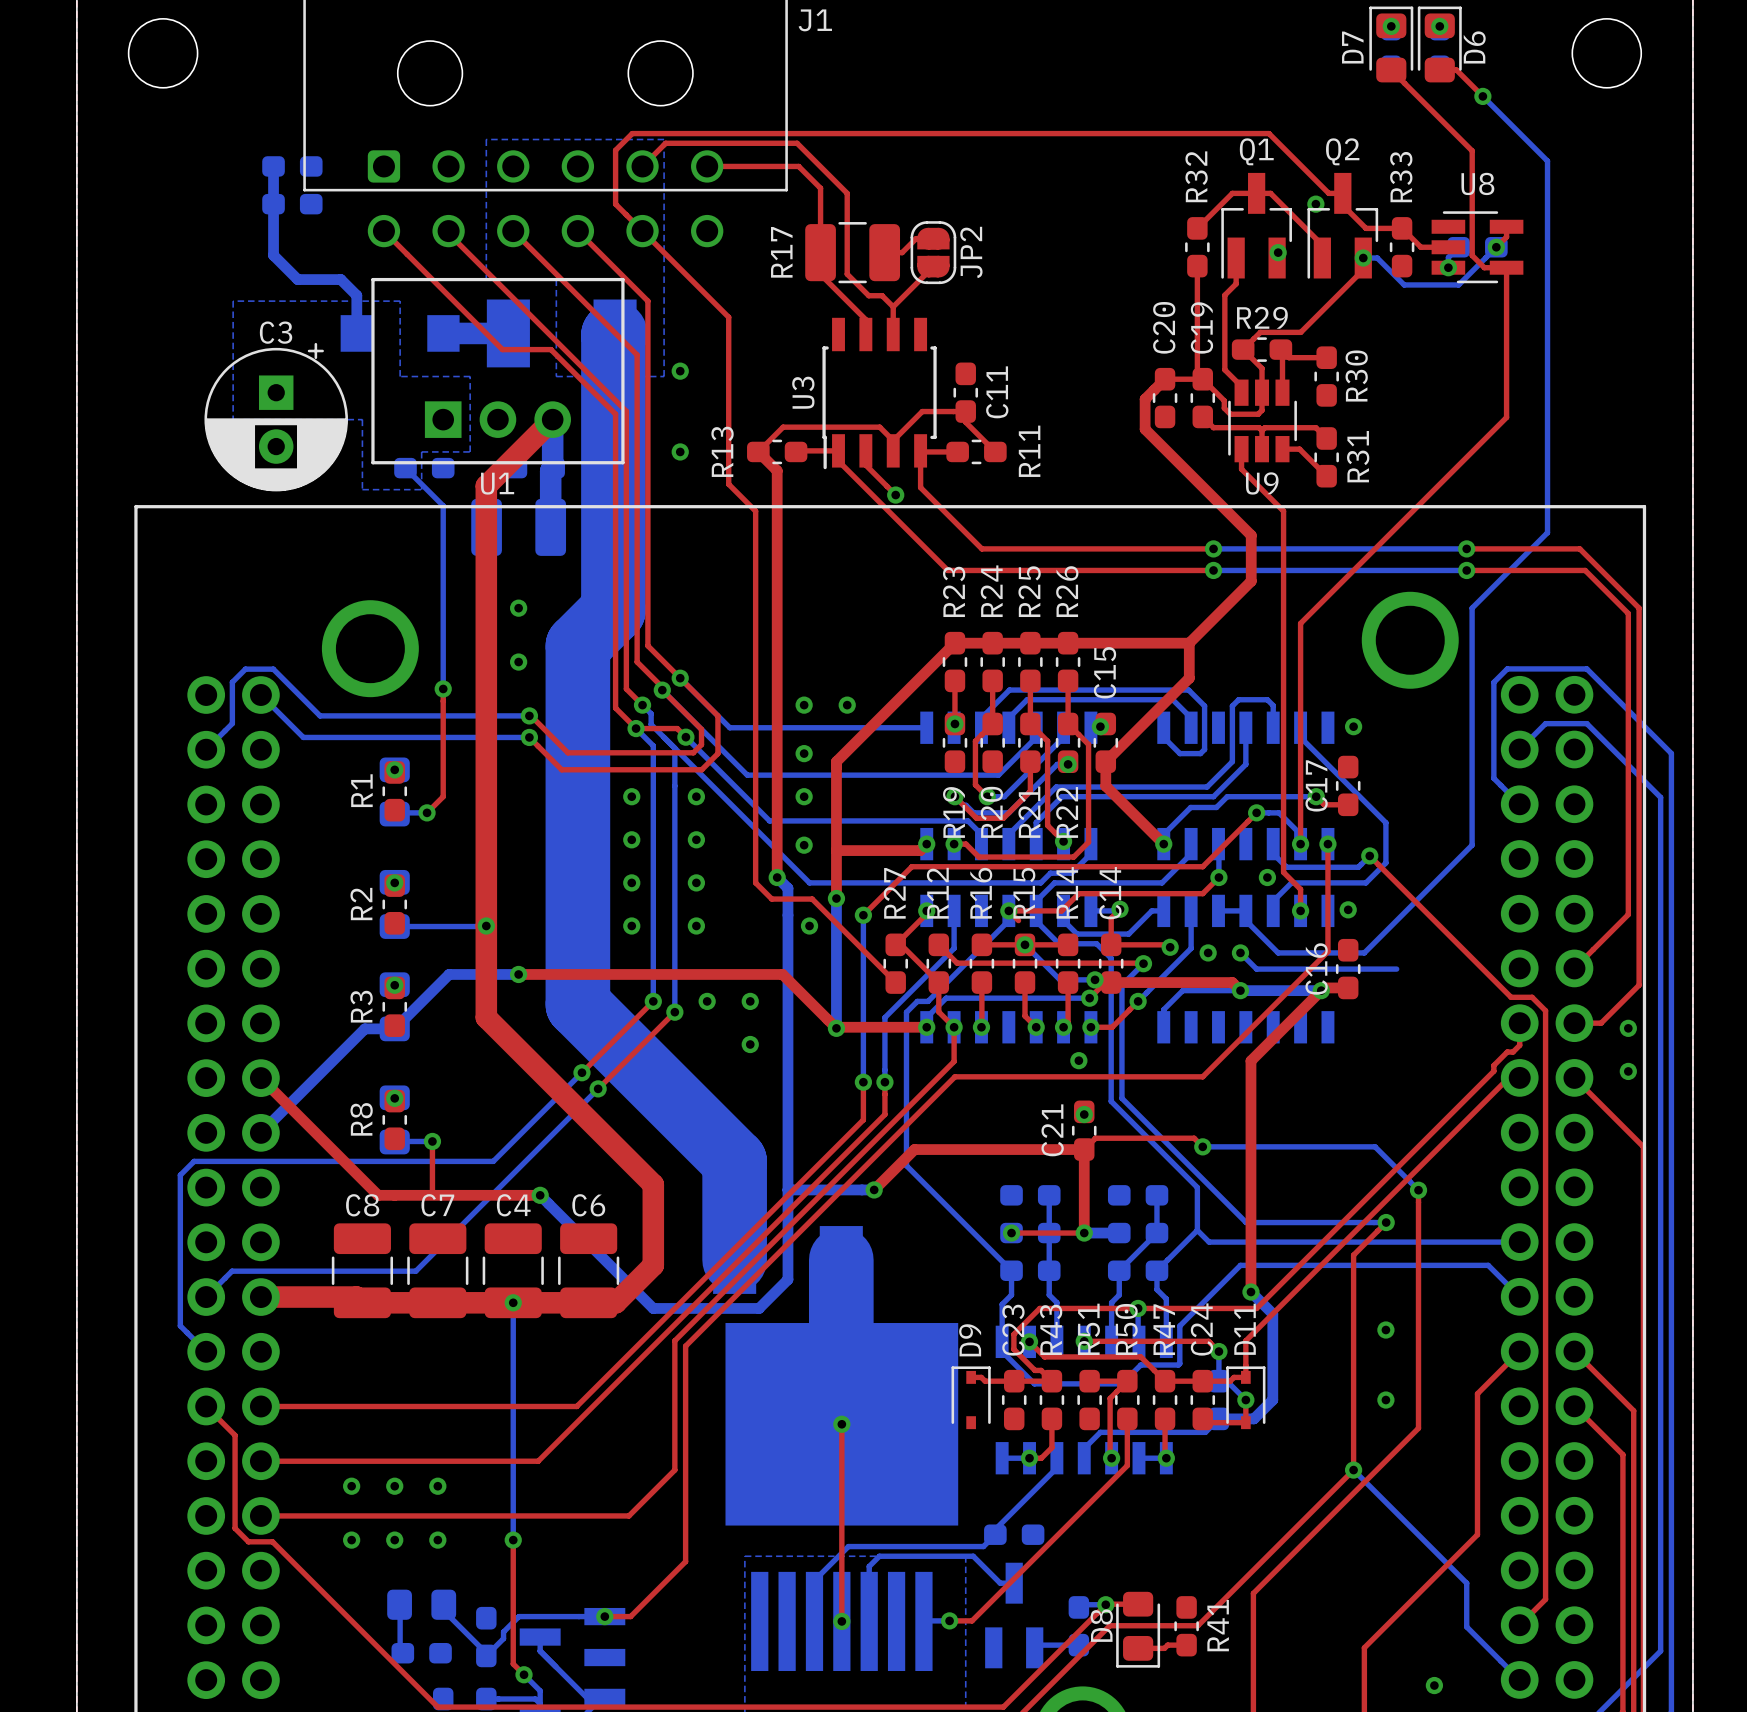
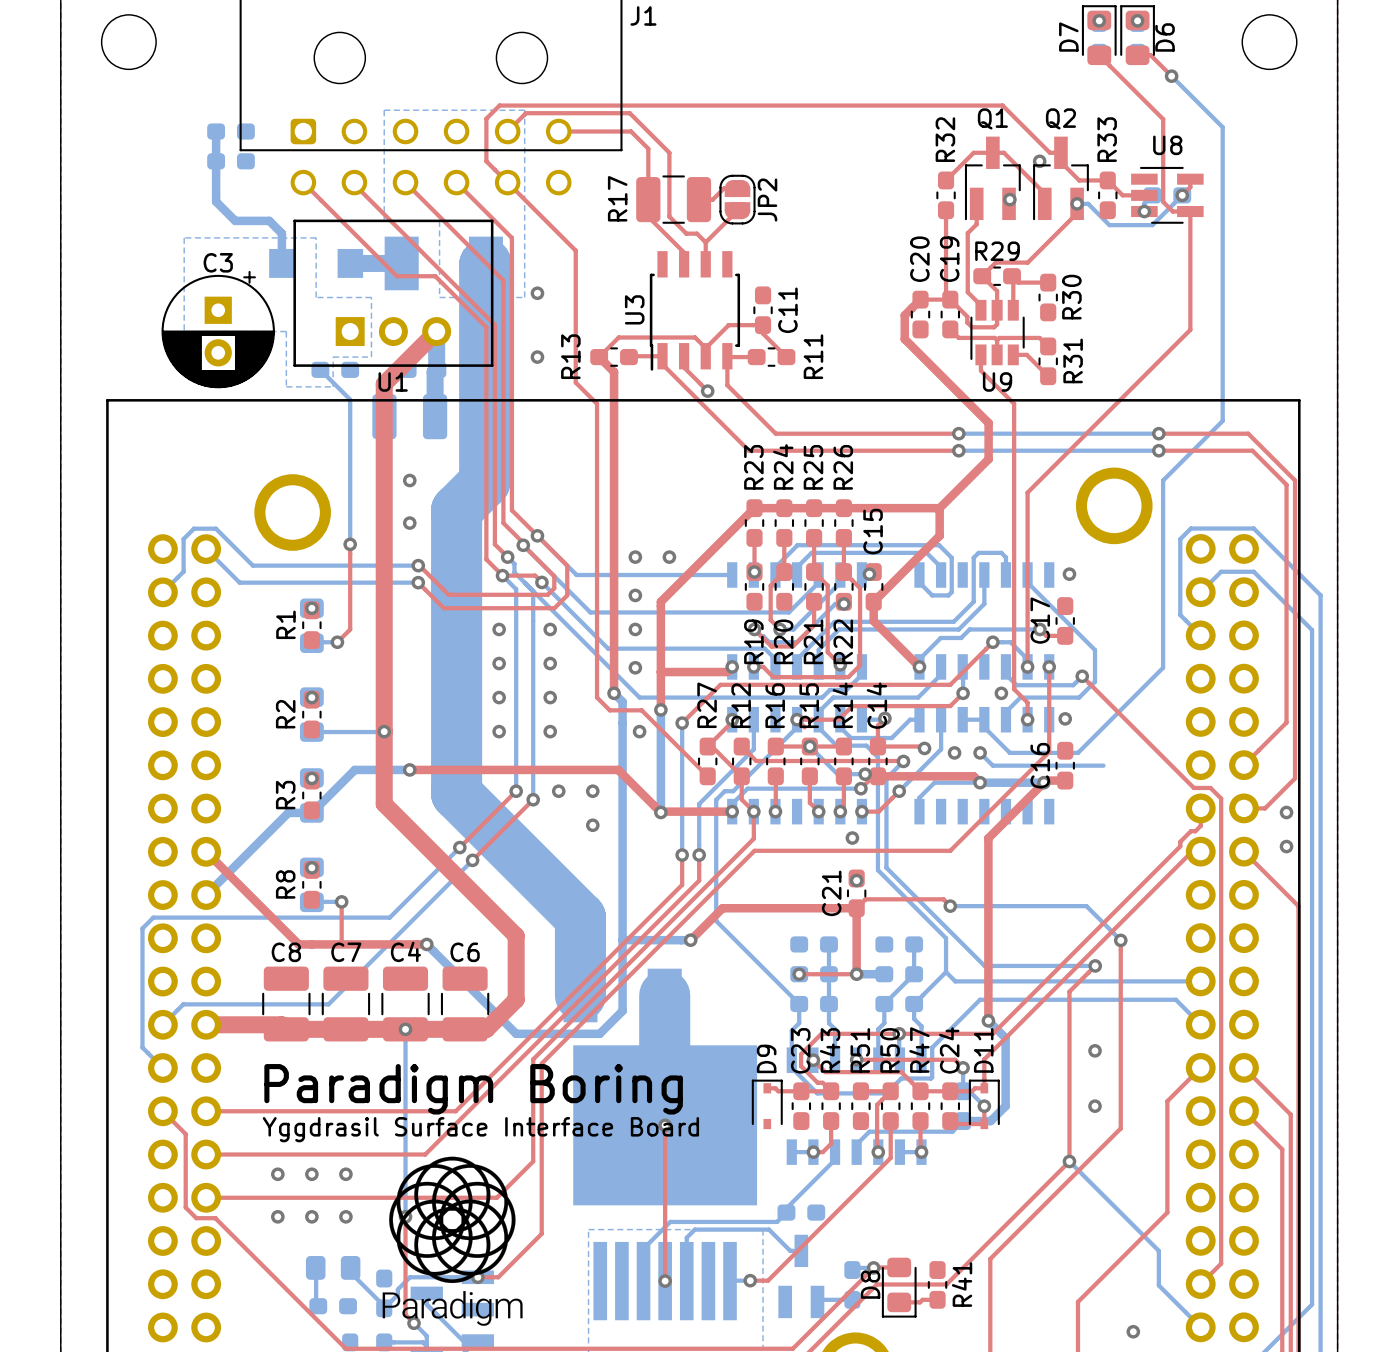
text: none -> Paradigm Boring (473, 1089)
text: none -> Yggdrasil Surface Interface Board (480, 1129)
drawing: none -> [382, 1156, 523, 1326]

